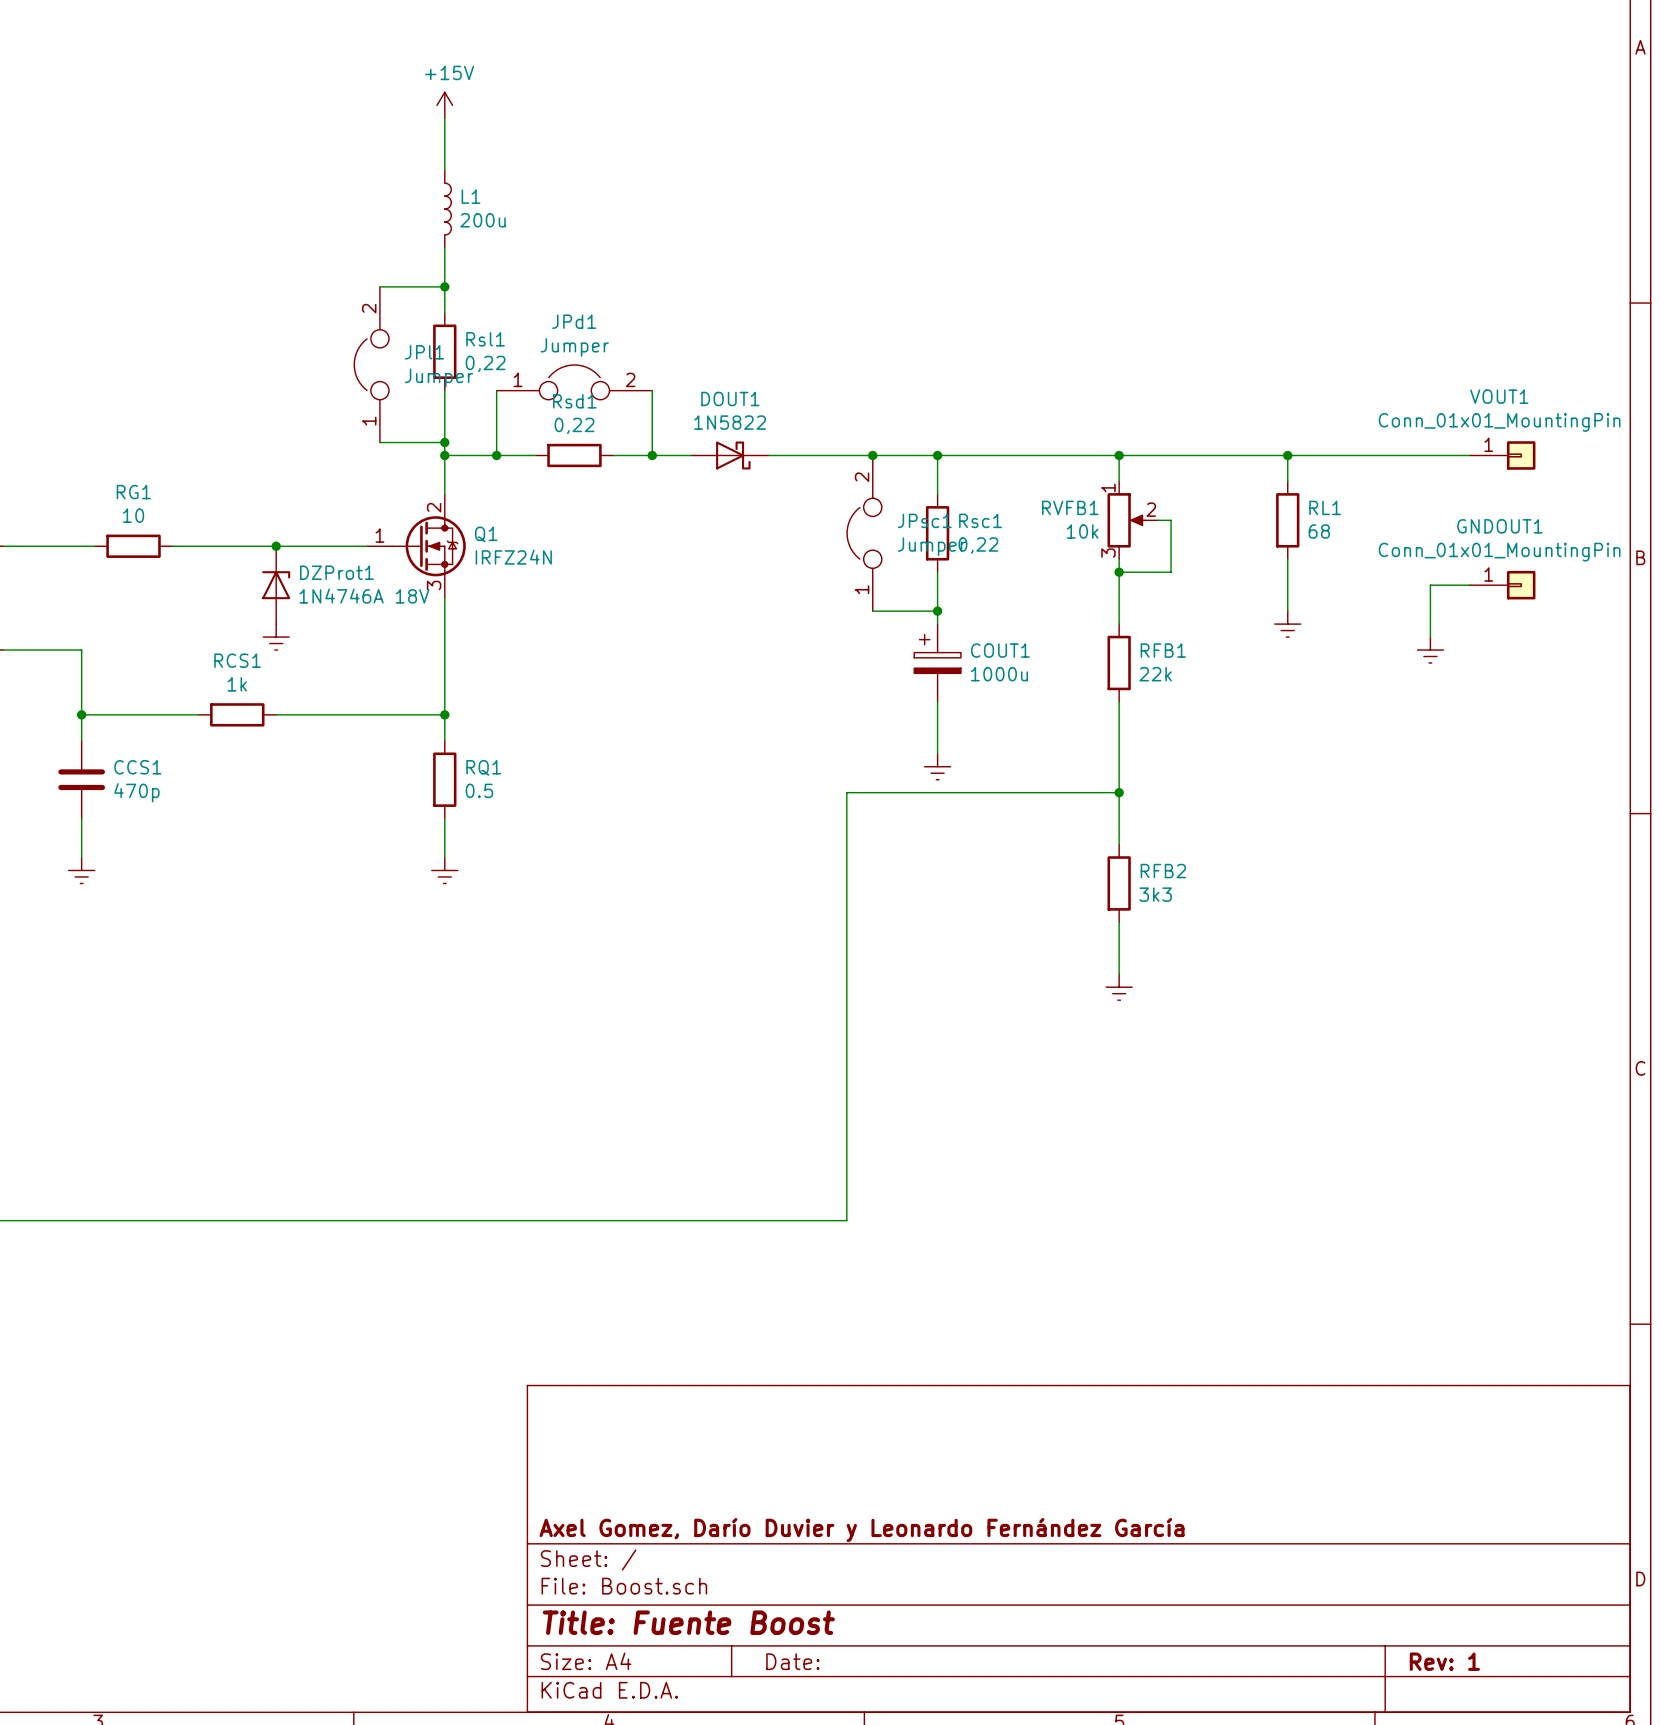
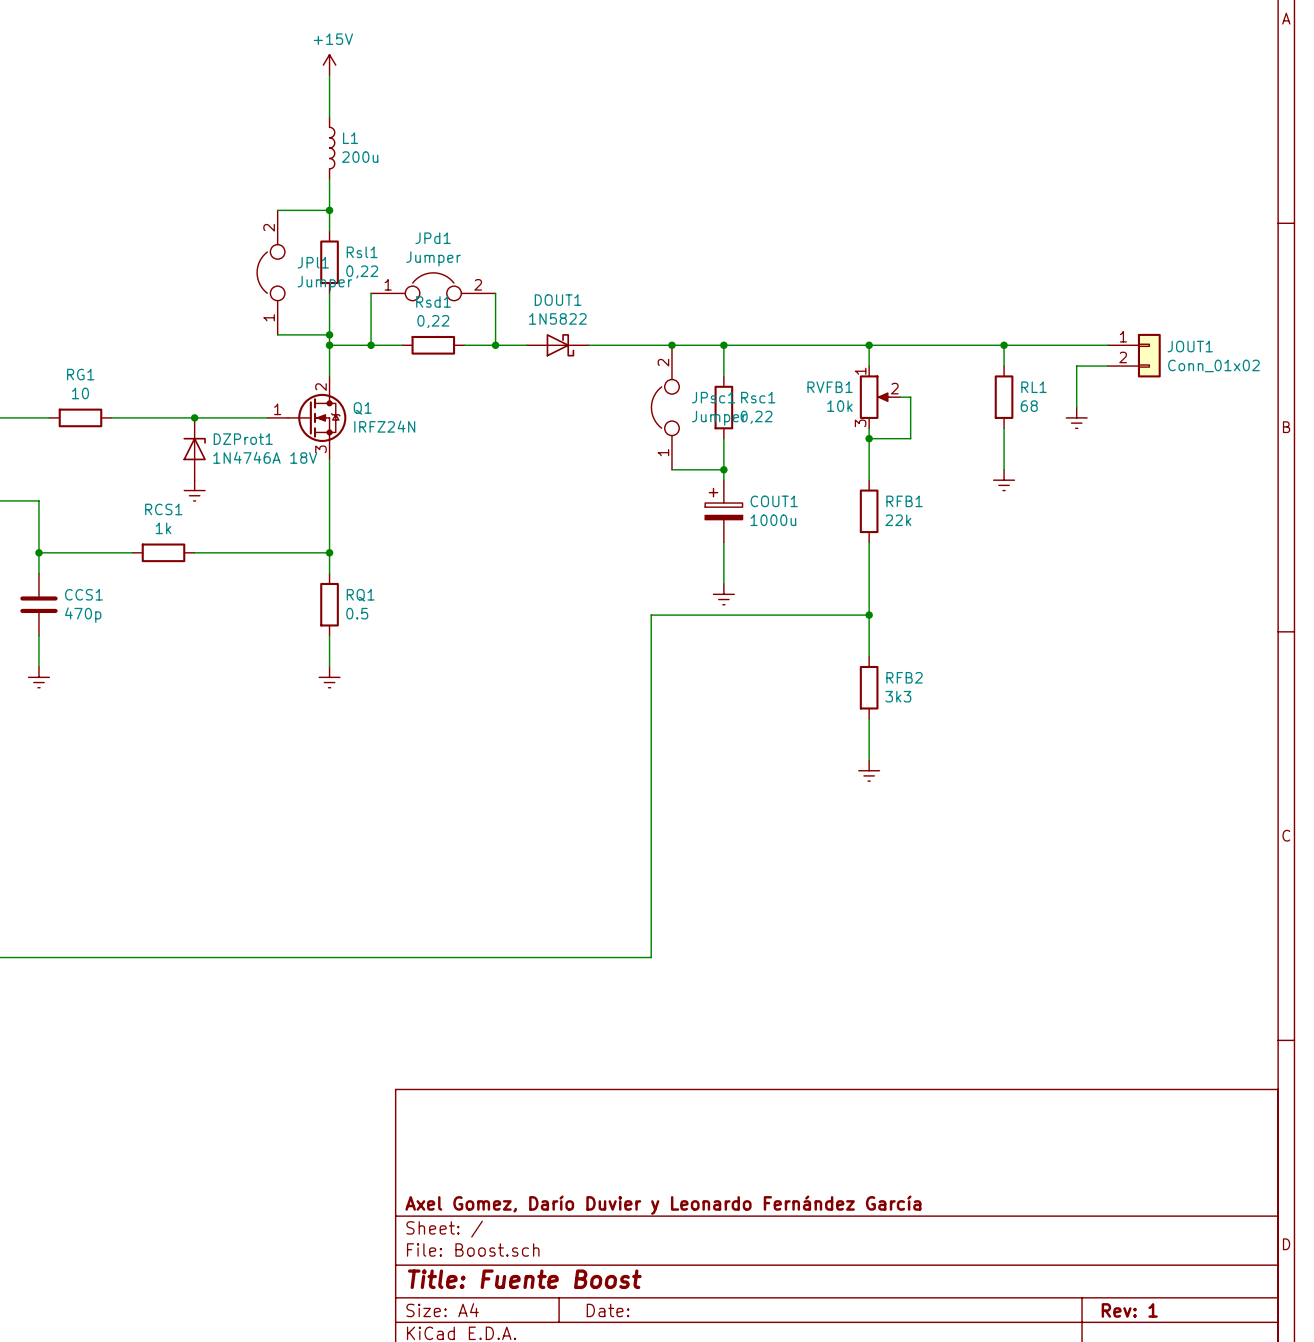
VOUT1: Conn_01x01_MountingPin (1502, 455) -> none
JOUT1: none -> Conn_01x02 (1134, 355)
wire: (1469, 585) (1430, 585) (1430, 637) -> (1107, 366) (1076, 366) (1076, 407)
GNDOUT1: Conn_01x01_MountingPin (1502, 585) -> none
power symbol position: (1430, 650) -> (1076, 417)

